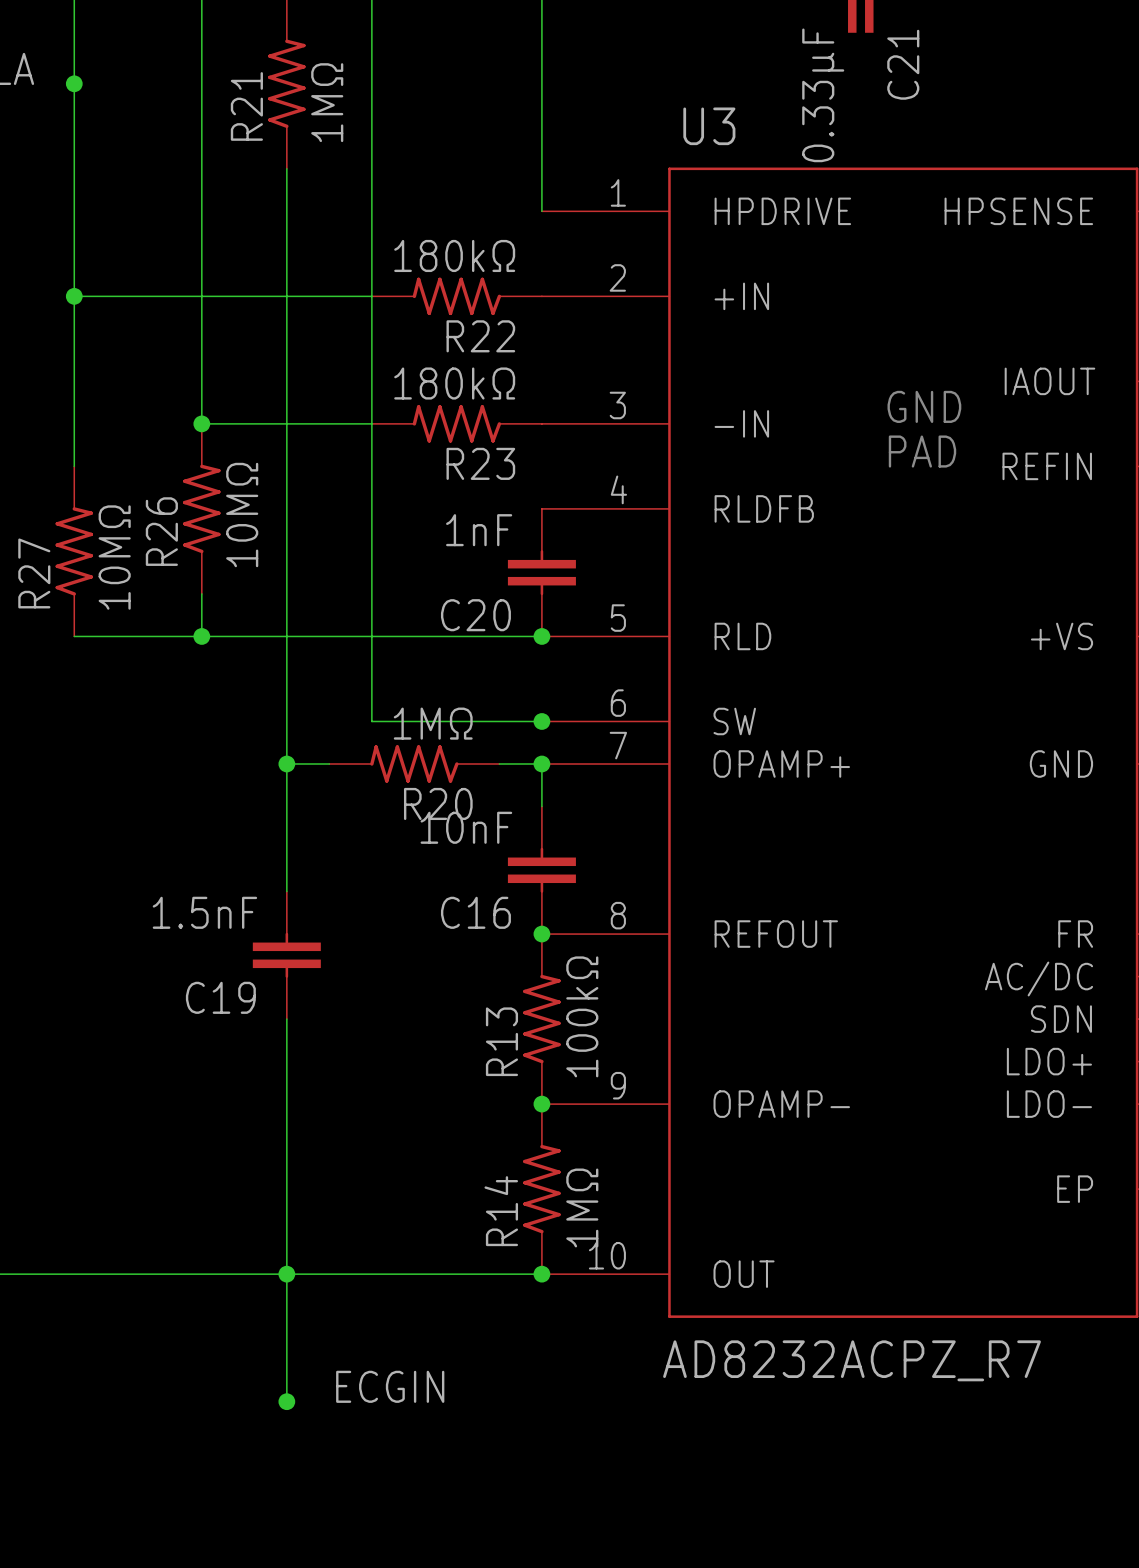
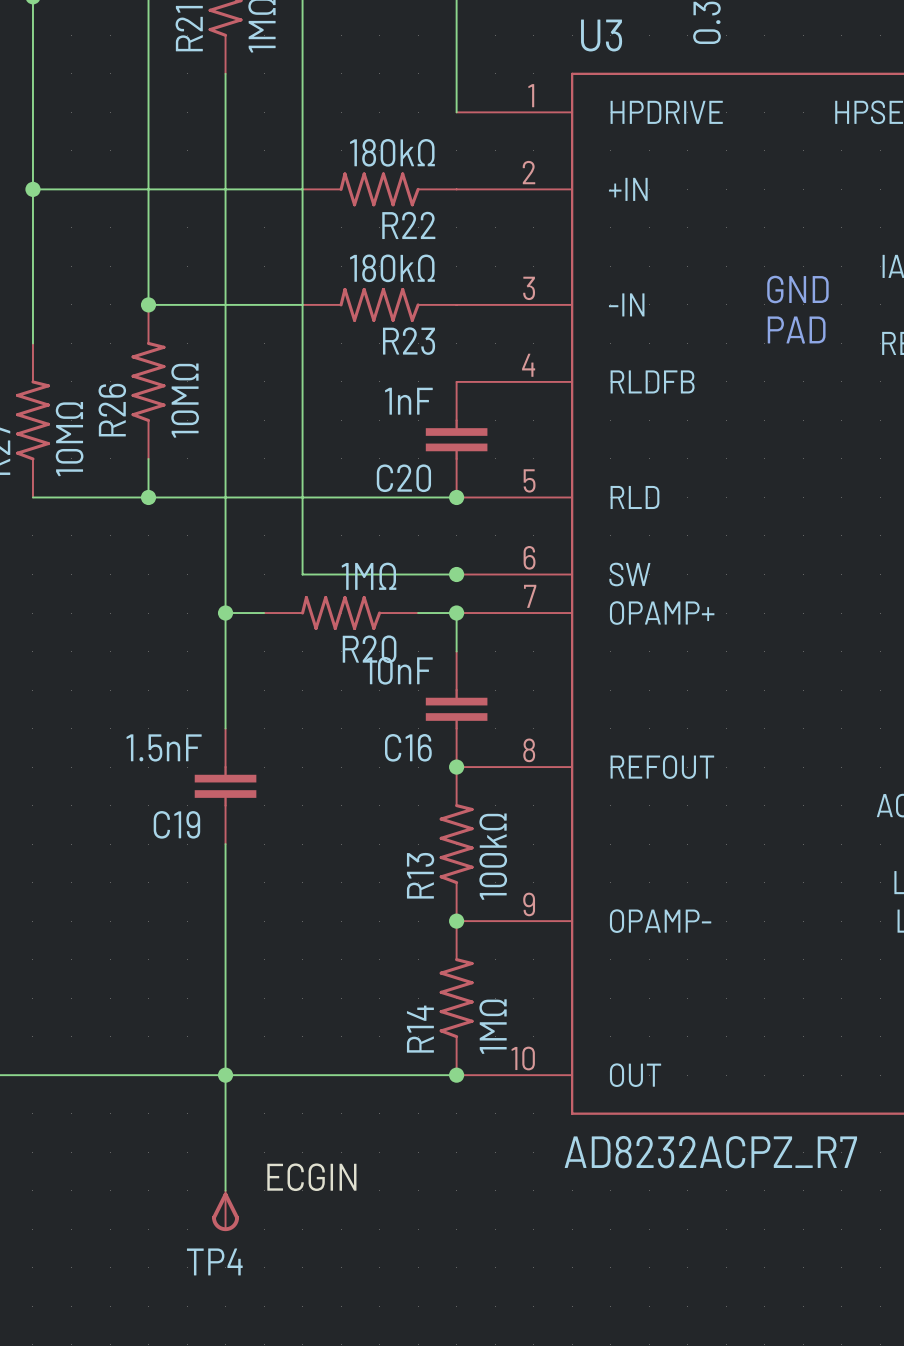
junction: (286, 1401) -> none
TP4: none -> (225, 1210)

